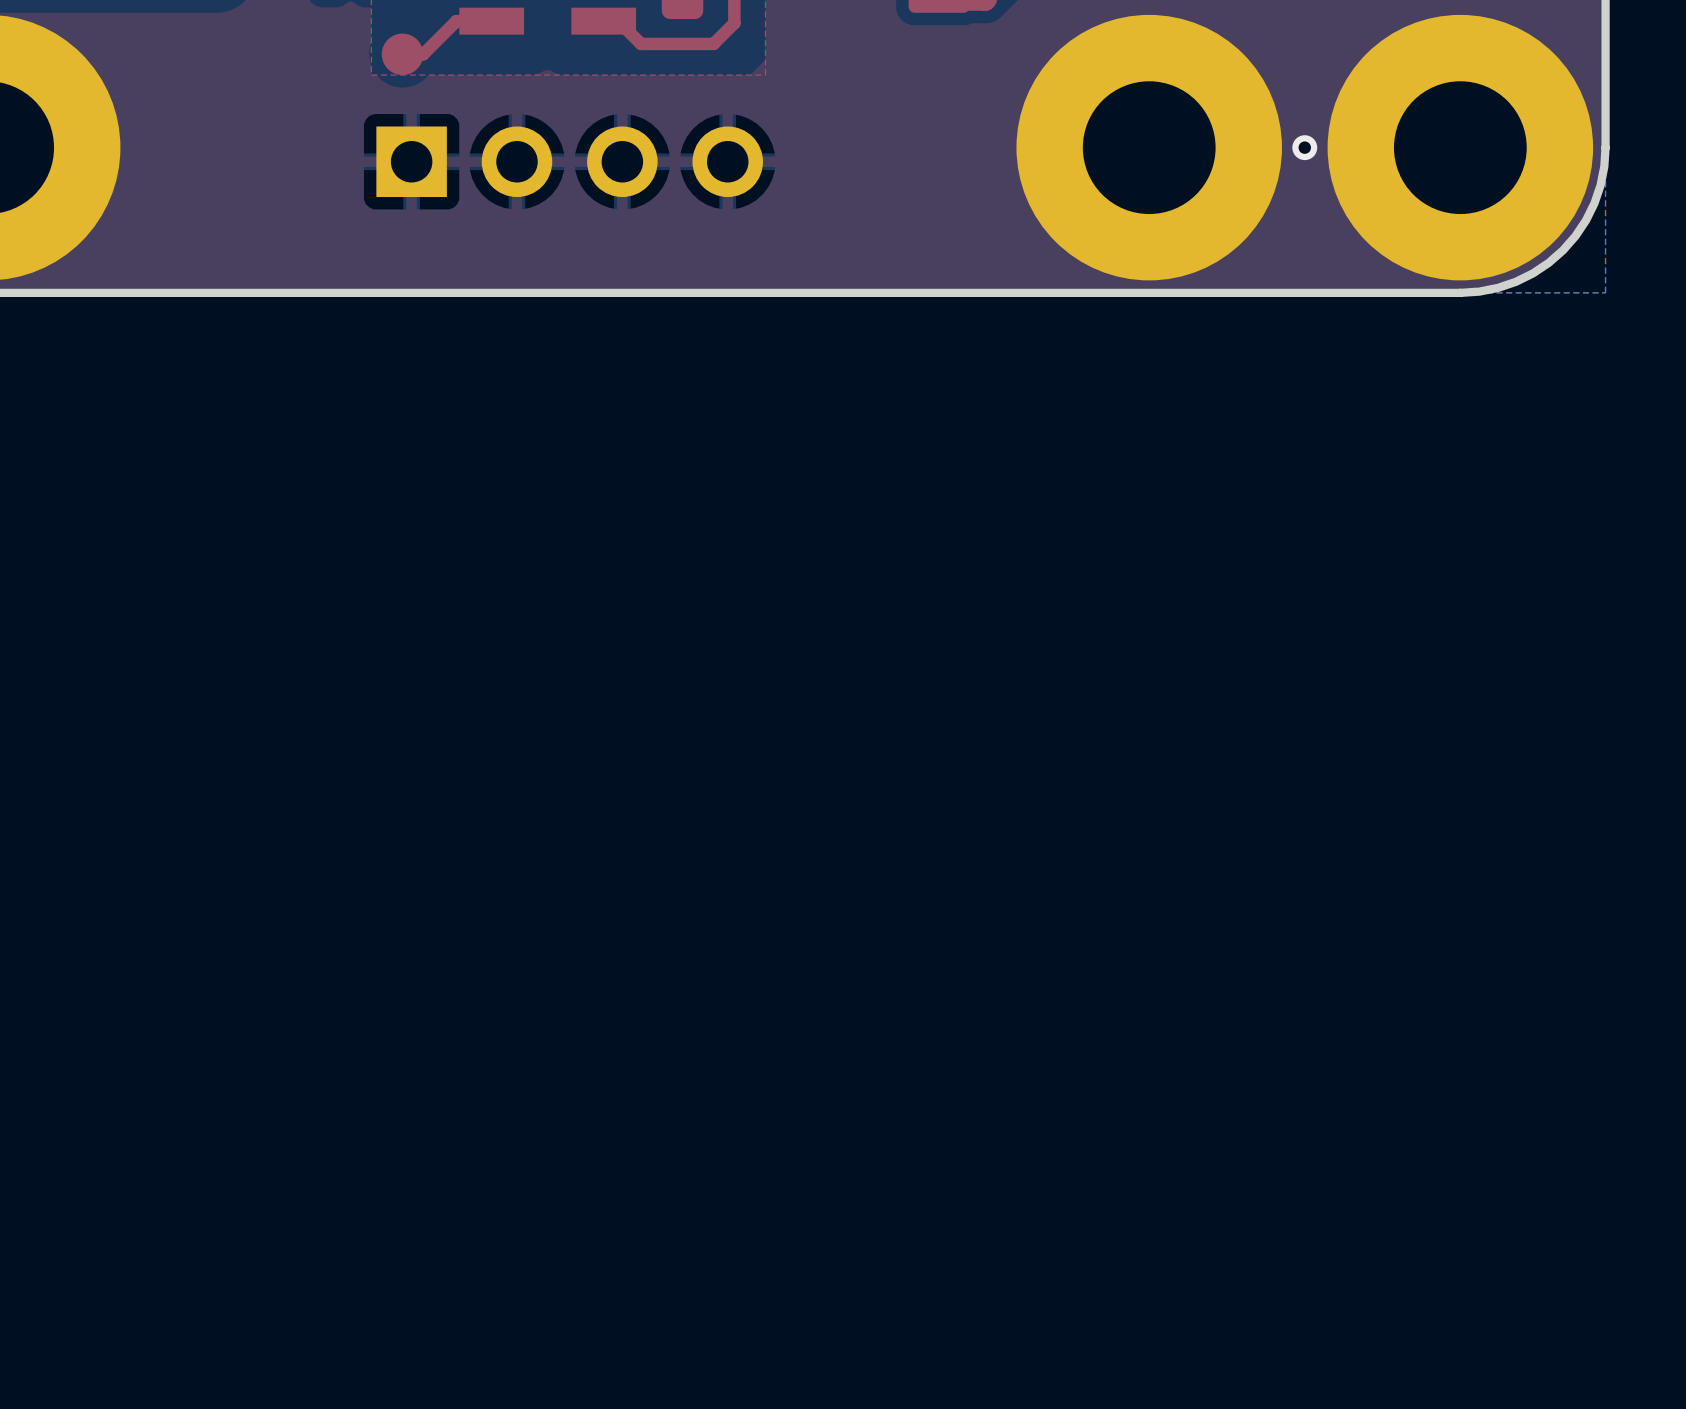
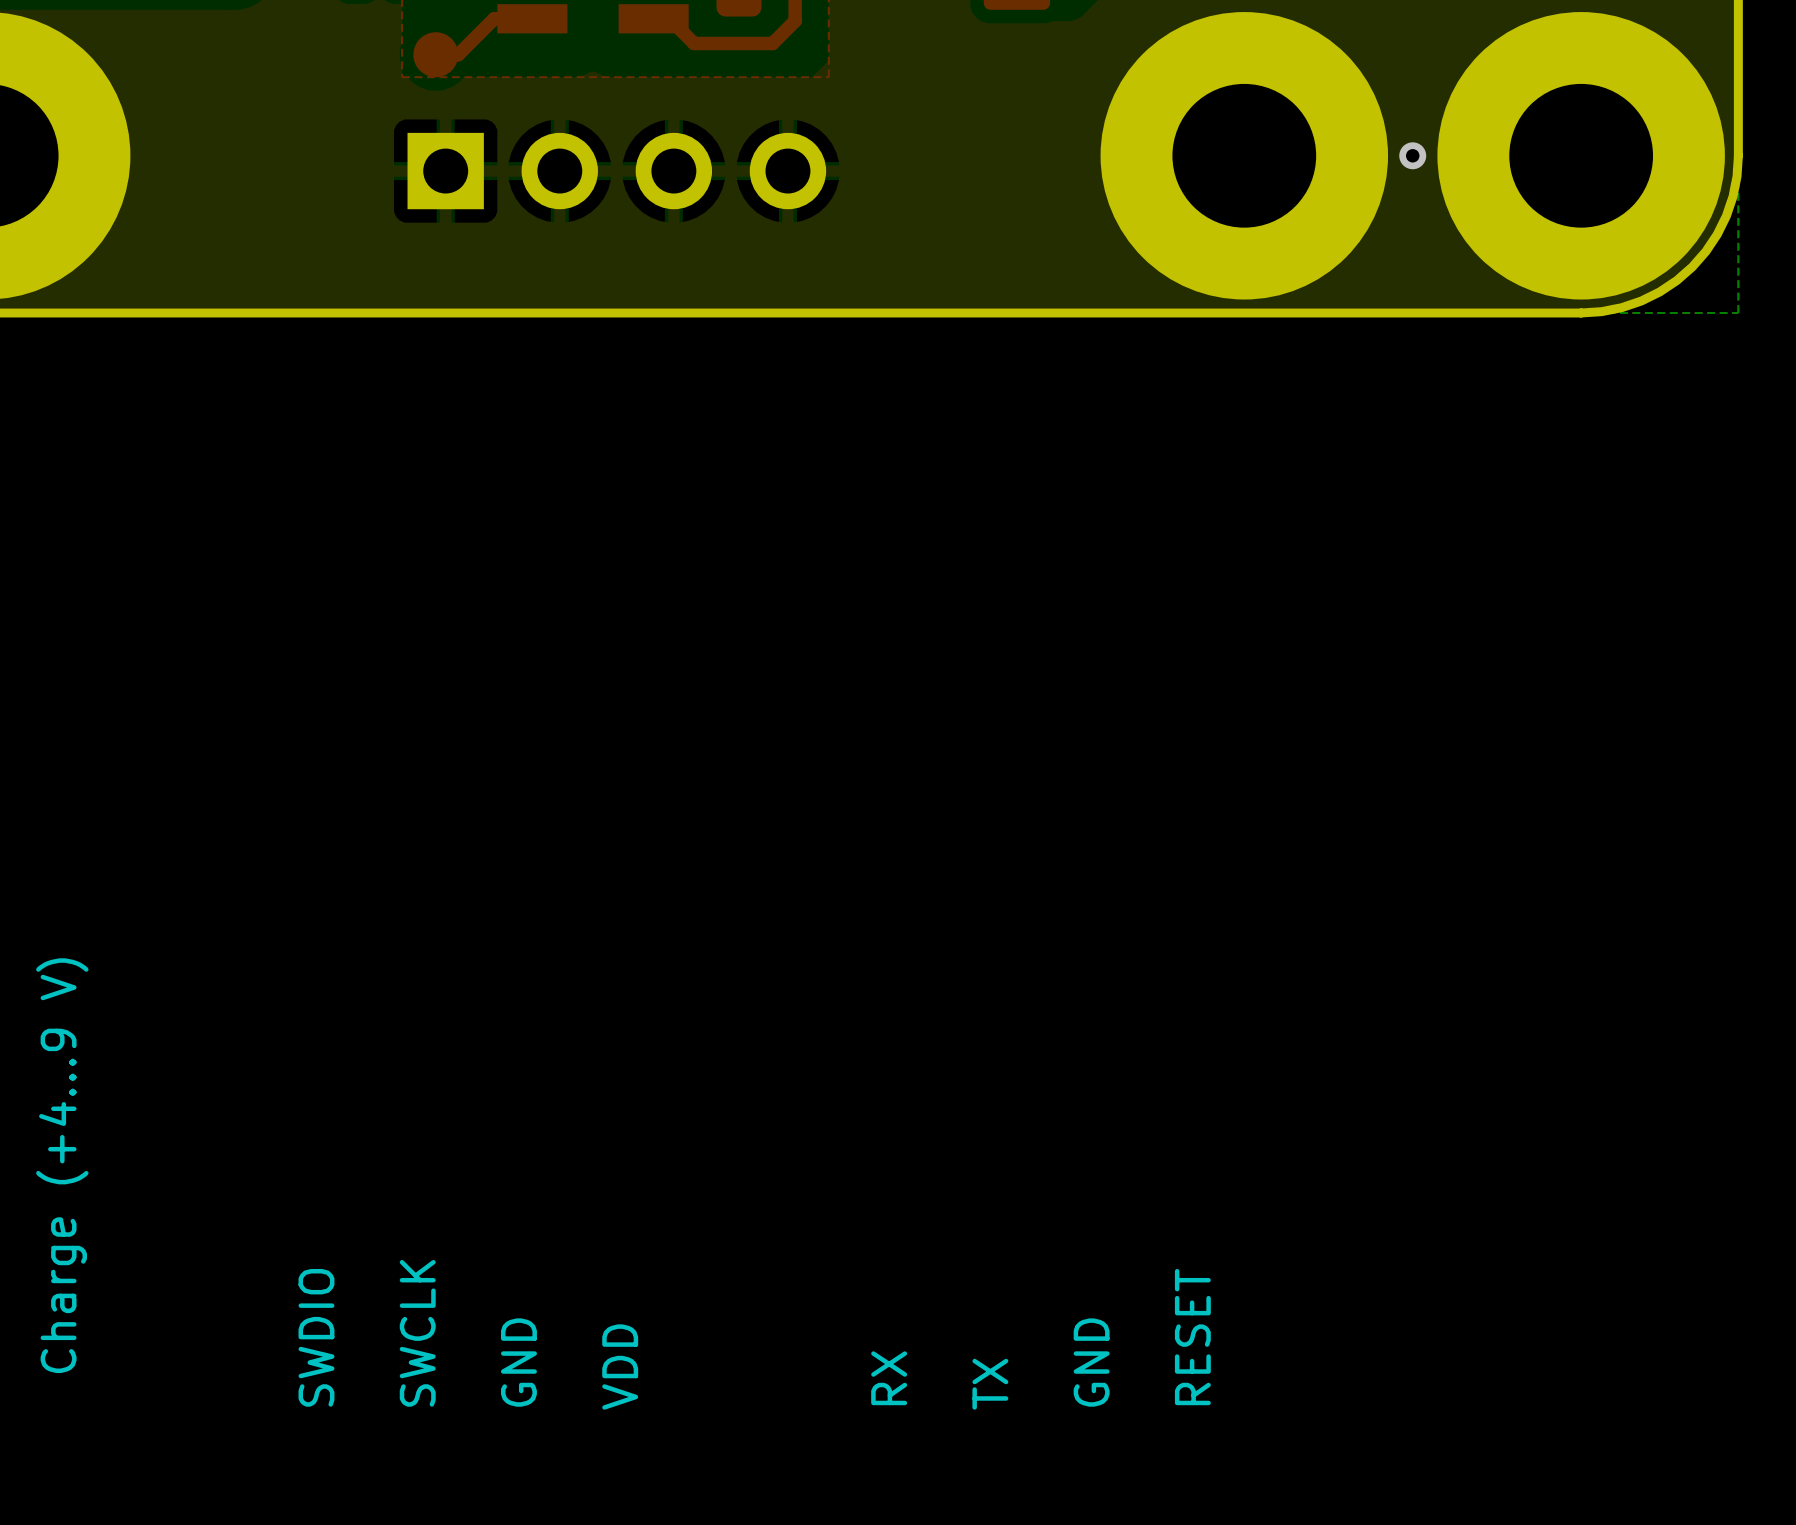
text: none -> Charge (+4...9 V) (62, 1165)
text: none -> SWCLK (417, 1333)
text: none -> SWDIO (316, 1337)
text: none -> RESET (1192, 1337)
text: none -> GND (518, 1362)
text: none -> GND (1091, 1362)
text: none -> VDD (620, 1367)
text: none -> RX (889, 1378)
text: none -> TX (990, 1384)

